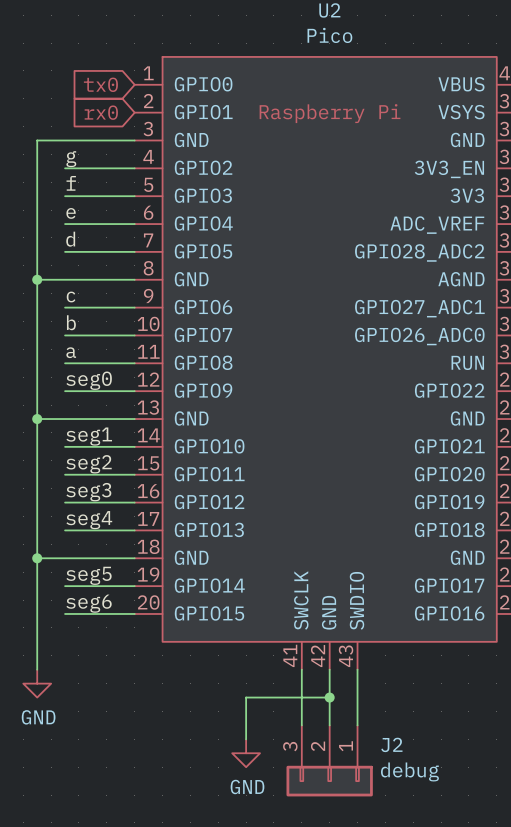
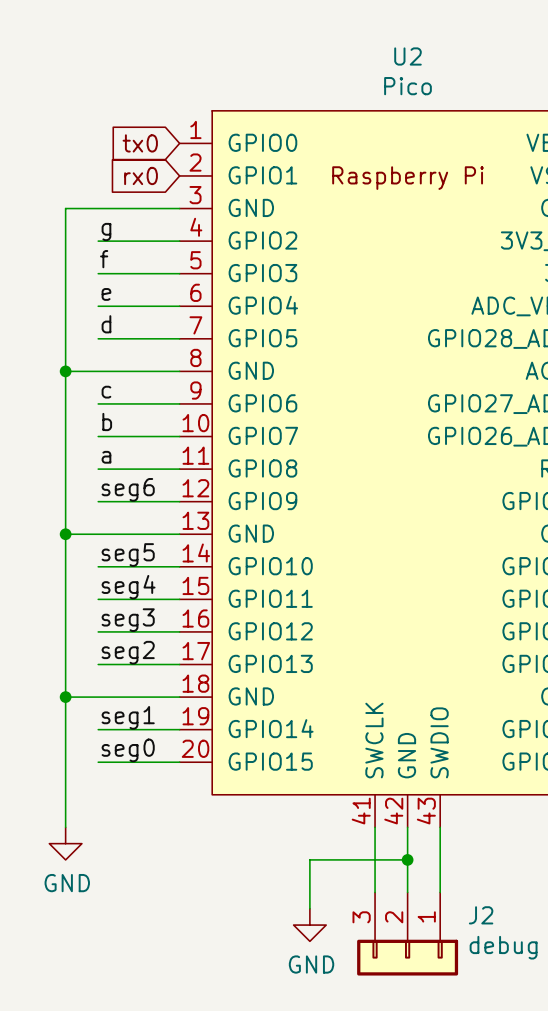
label: seg0 (89, 380) -> seg6 (128, 489)
label: seg1 (89, 436) -> seg5 (128, 554)
label: seg2 (89, 464) -> seg4 (128, 587)
label: seg4 (89, 520) -> seg2 (128, 652)
label: seg5 (89, 575) -> seg1 (128, 717)
label: seg6 (89, 603) -> seg0 (128, 750)

